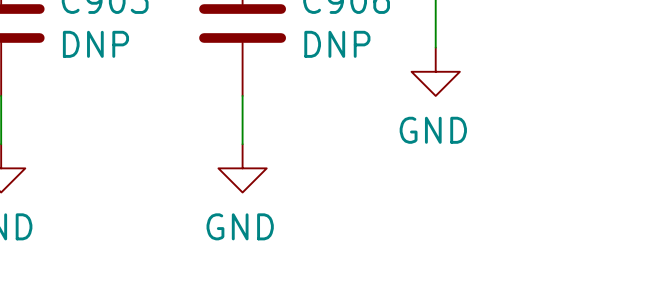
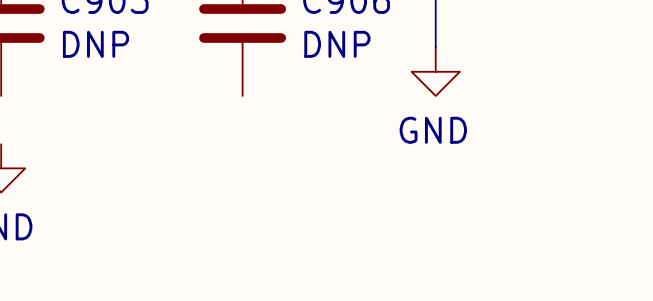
wire: (1, 95) (1, 144) -> none
wire: (242, 95) (242, 144) -> none
power symbol: GND (242, 168) -> none

